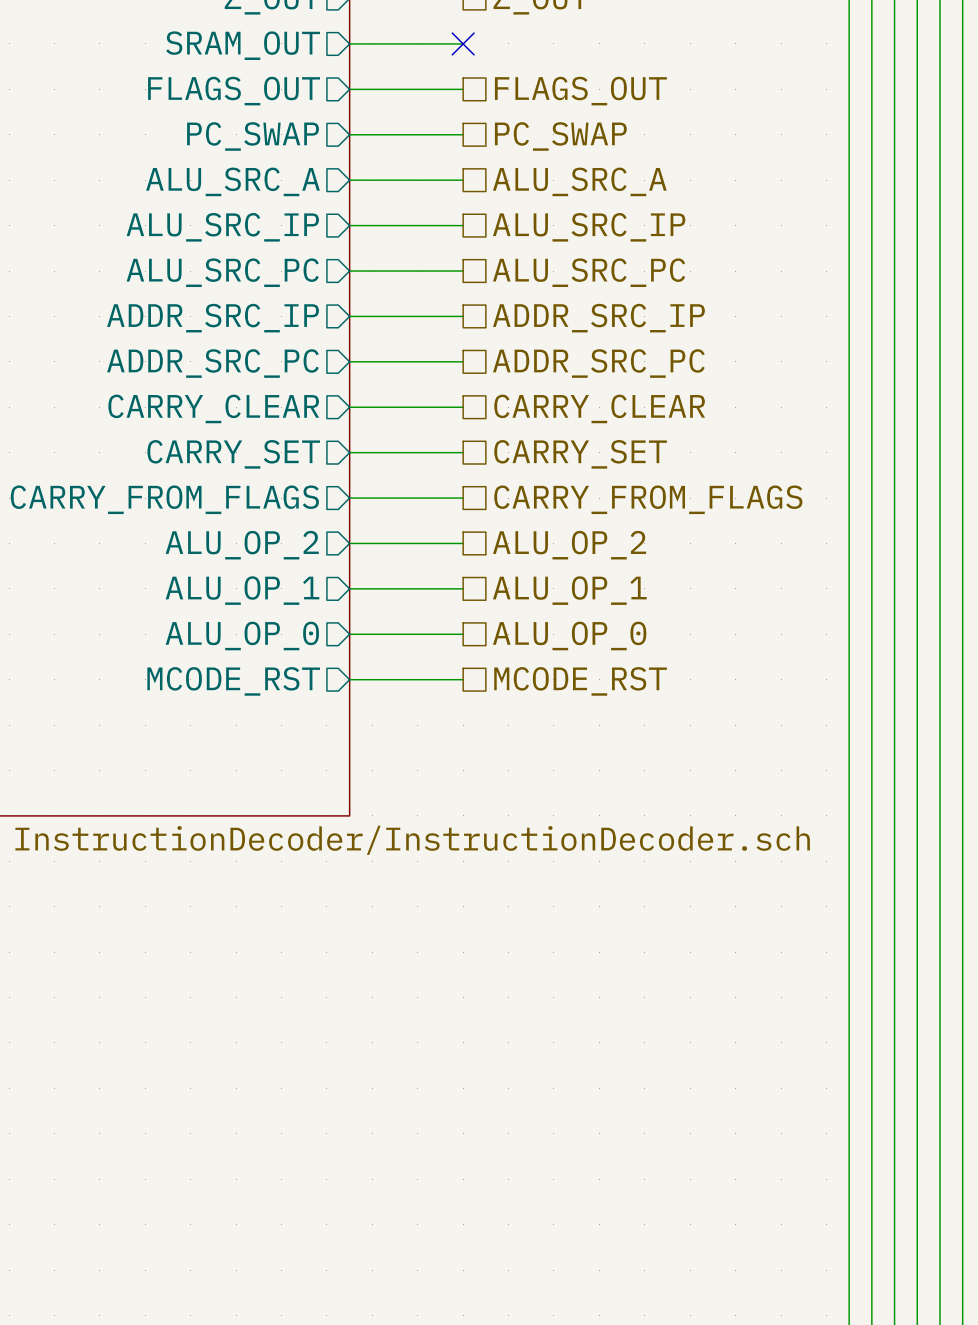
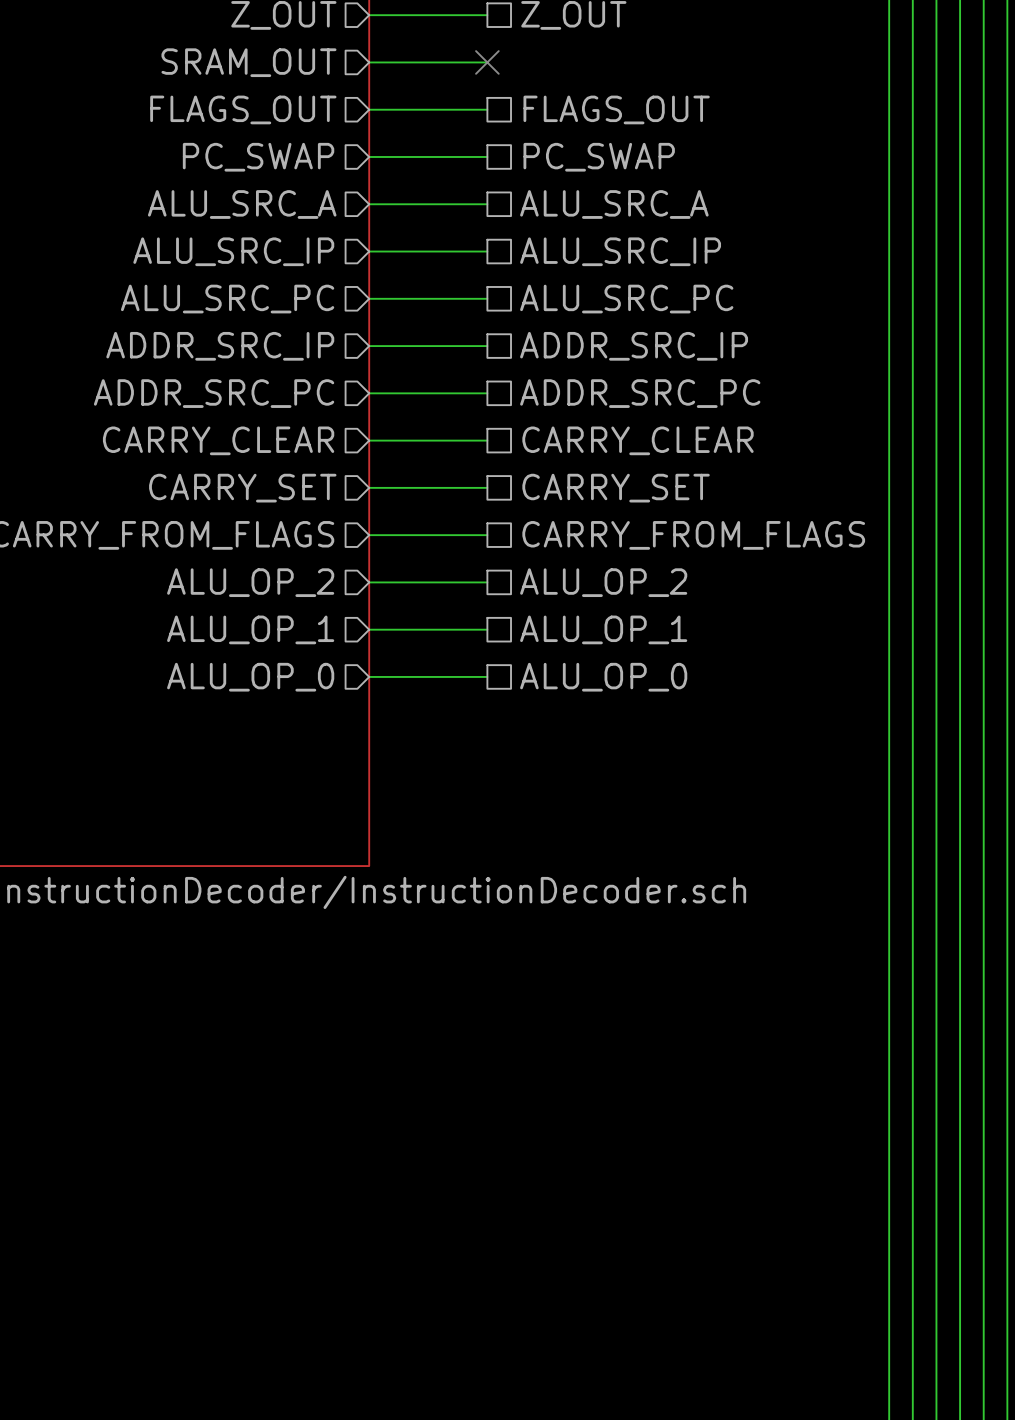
wire: (349, 679) (463, 679) -> none
sheet pin: MCODE_RST (233, 681) -> none
hierarchical label: MCODE_RST (580, 681) -> none

